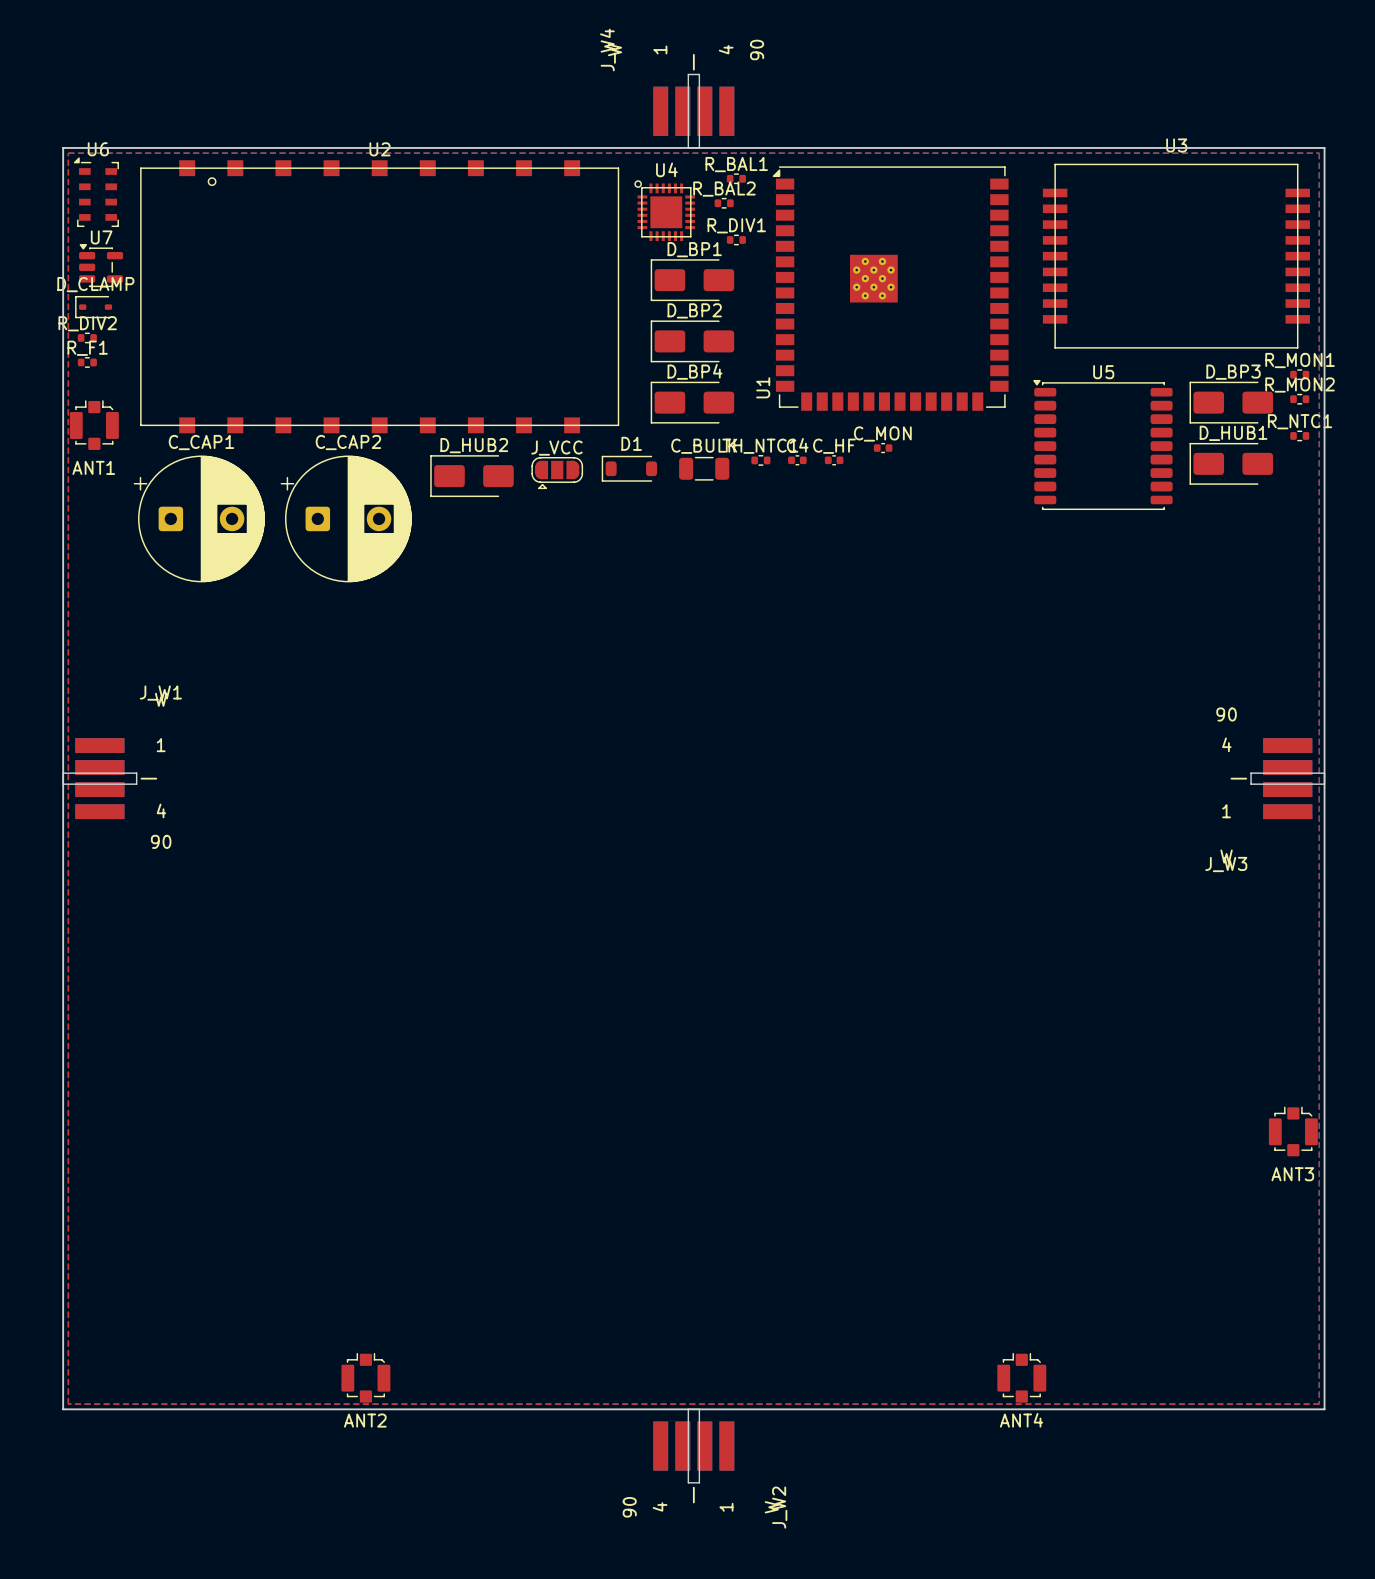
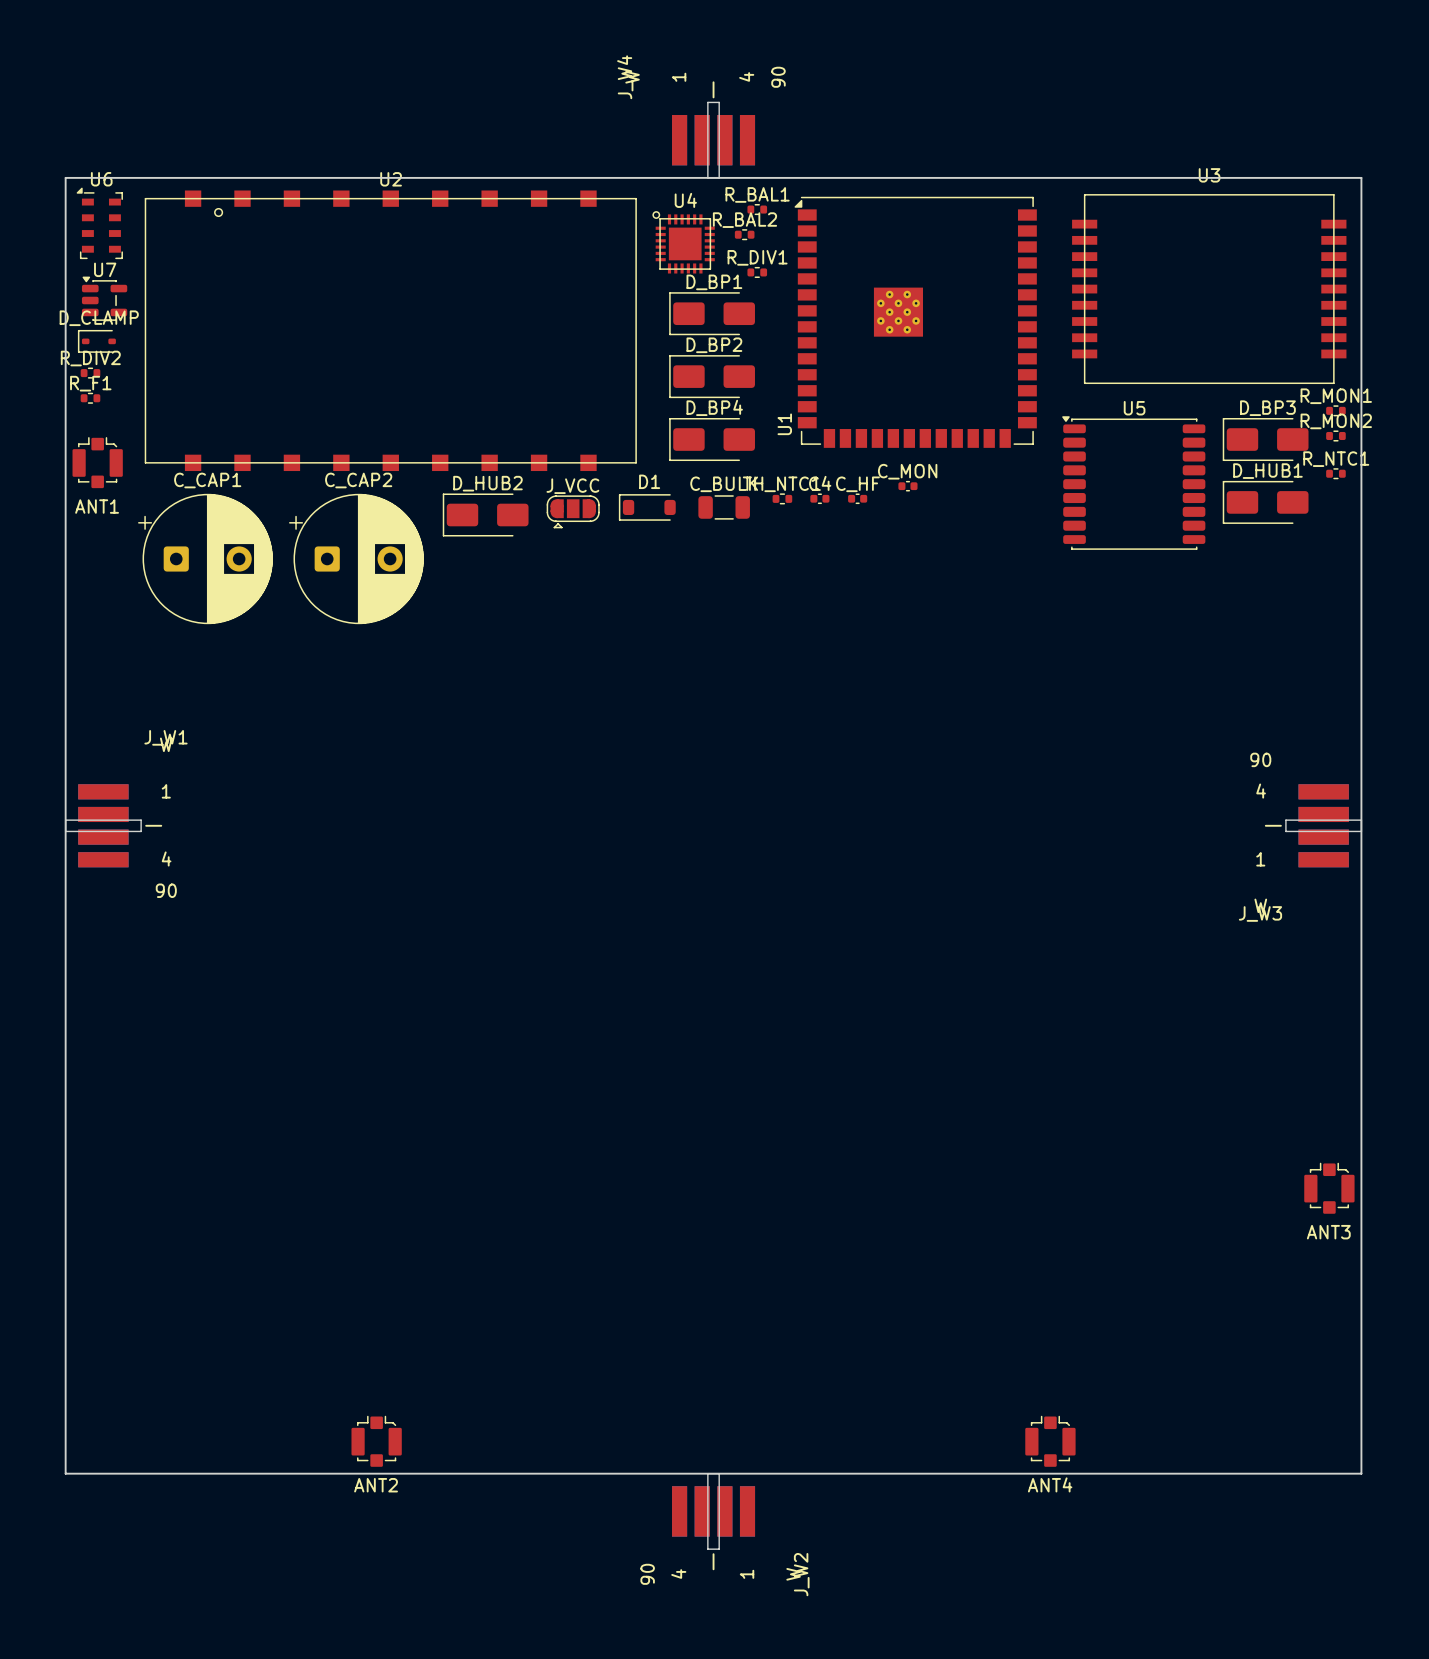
top zone outline: (68, 153) (1319, 153) (1319, 1404) (68, 1404) (68, 153) -> none

